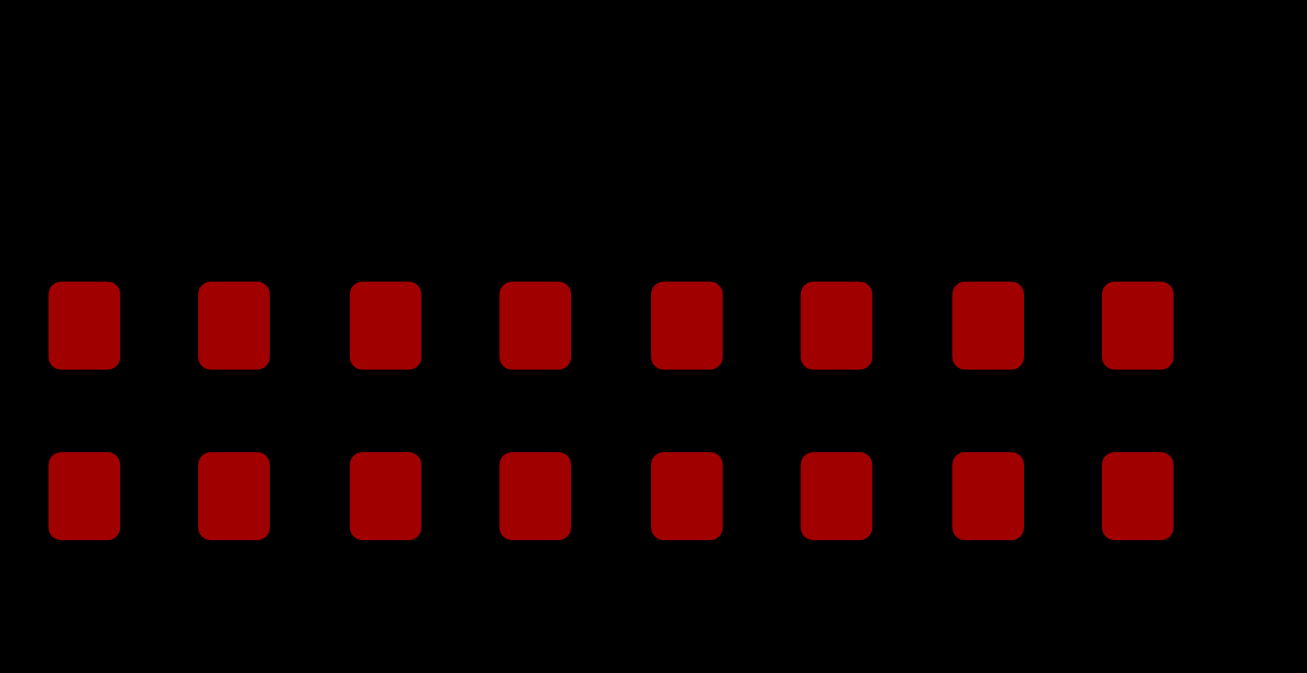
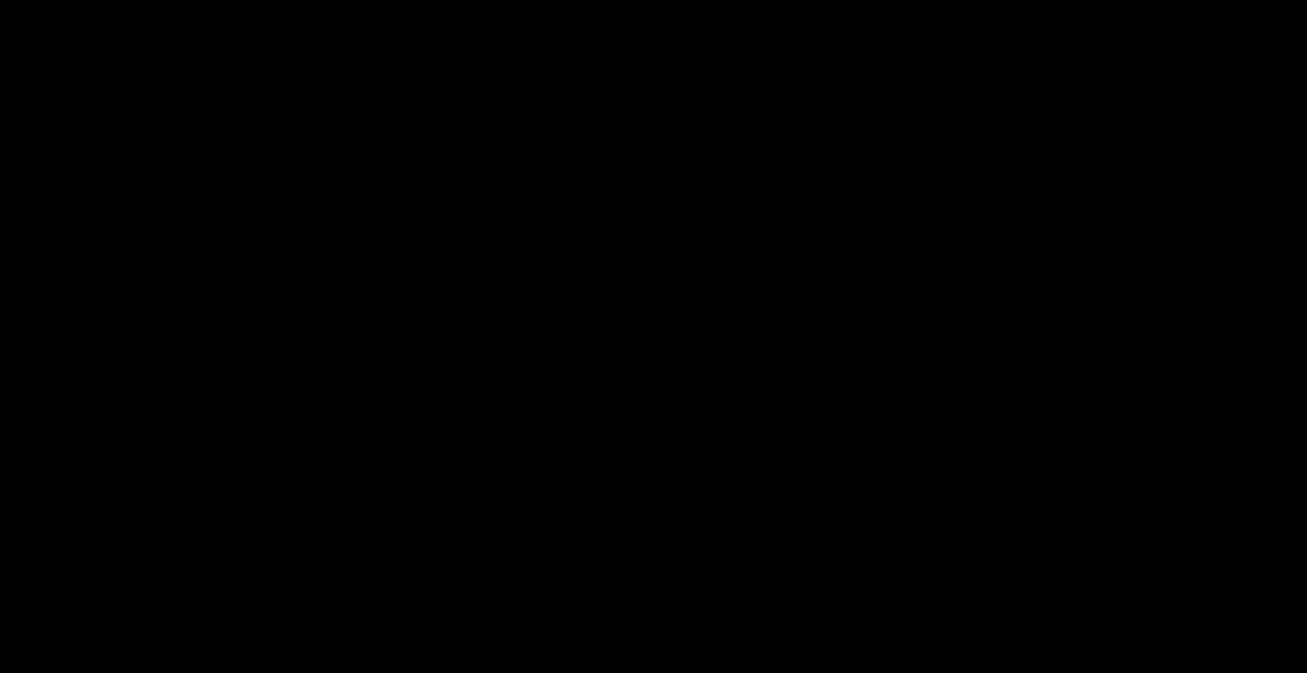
part: (159, 325) -> none
part: (460, 325) -> none
part: (761, 325) -> none
part: (1062, 325) -> none
part: (159, 496) -> none
part: (460, 496) -> none
part: (761, 496) -> none
part: (1062, 496) -> none

